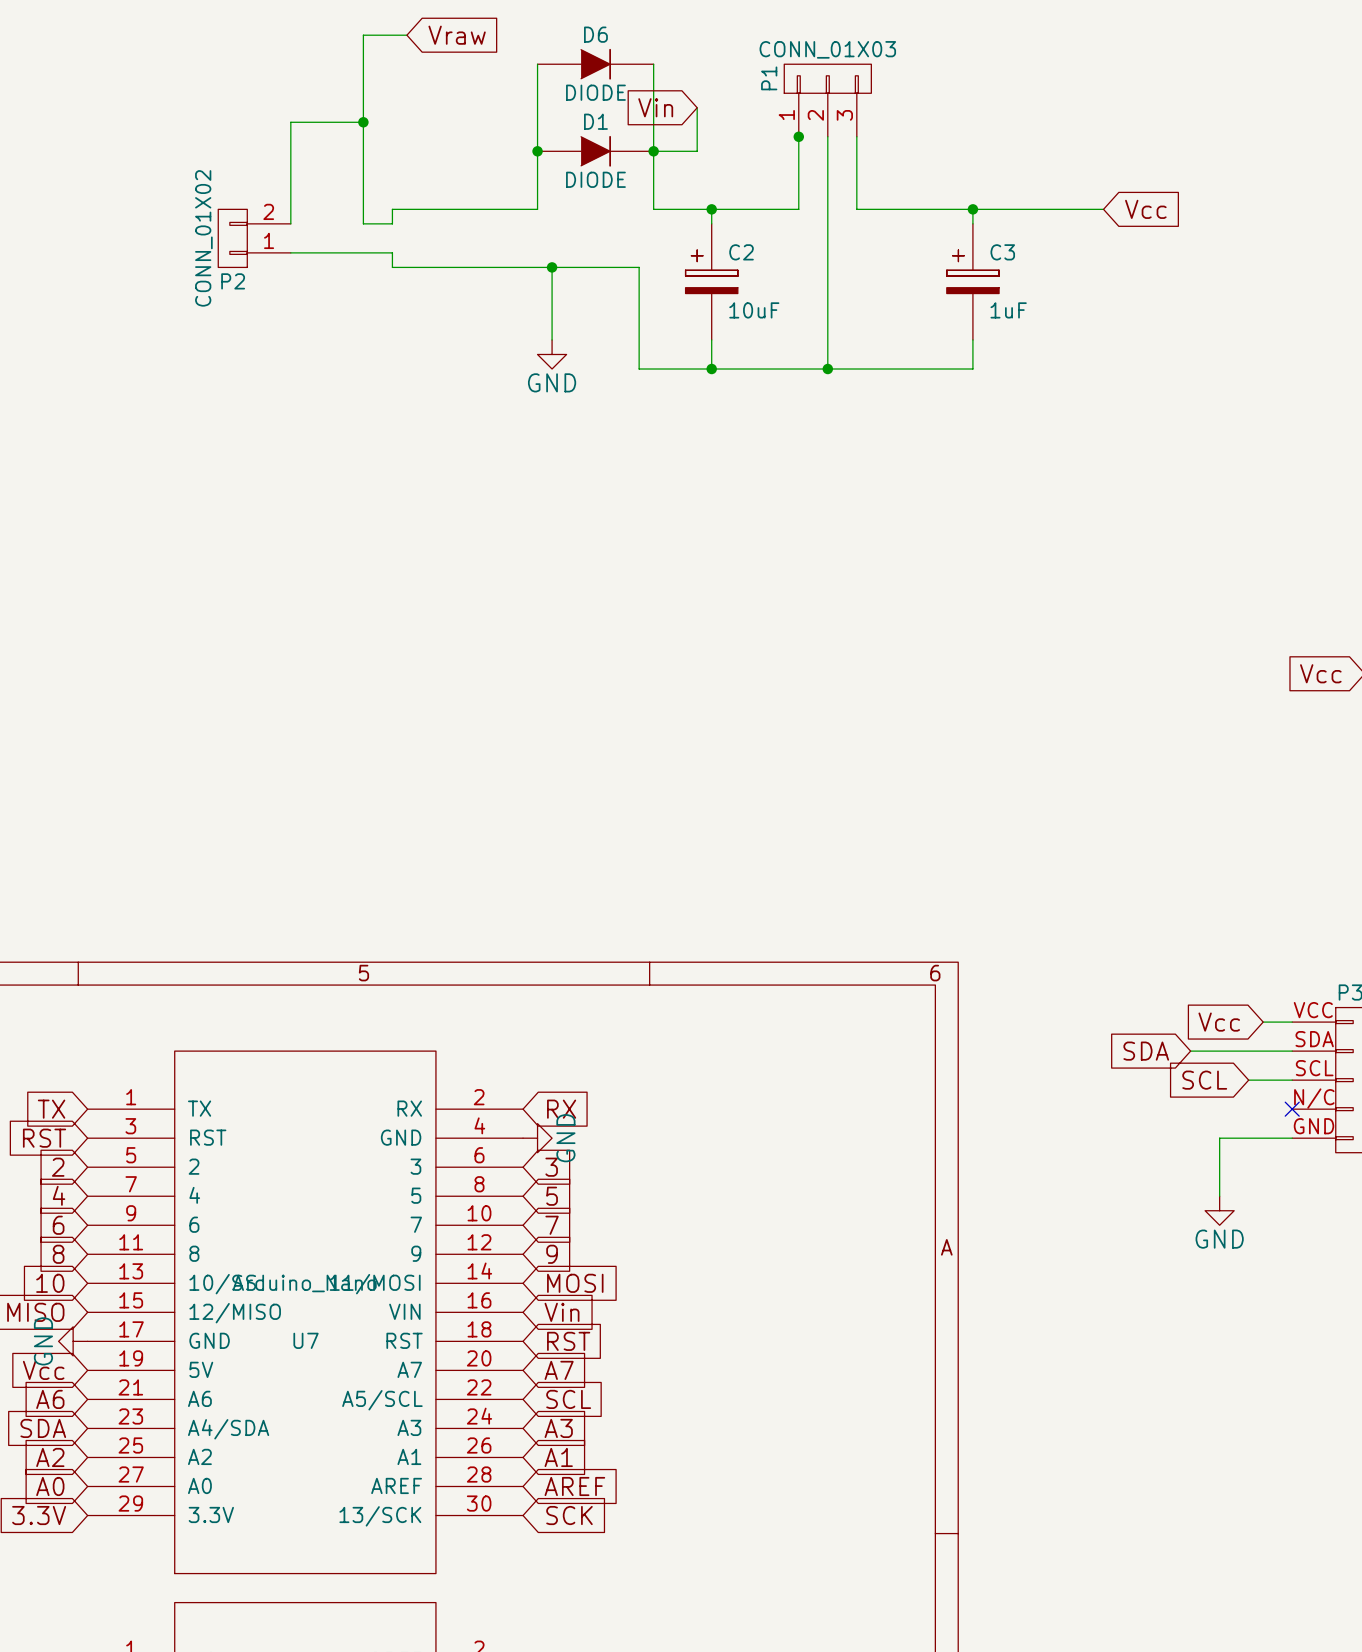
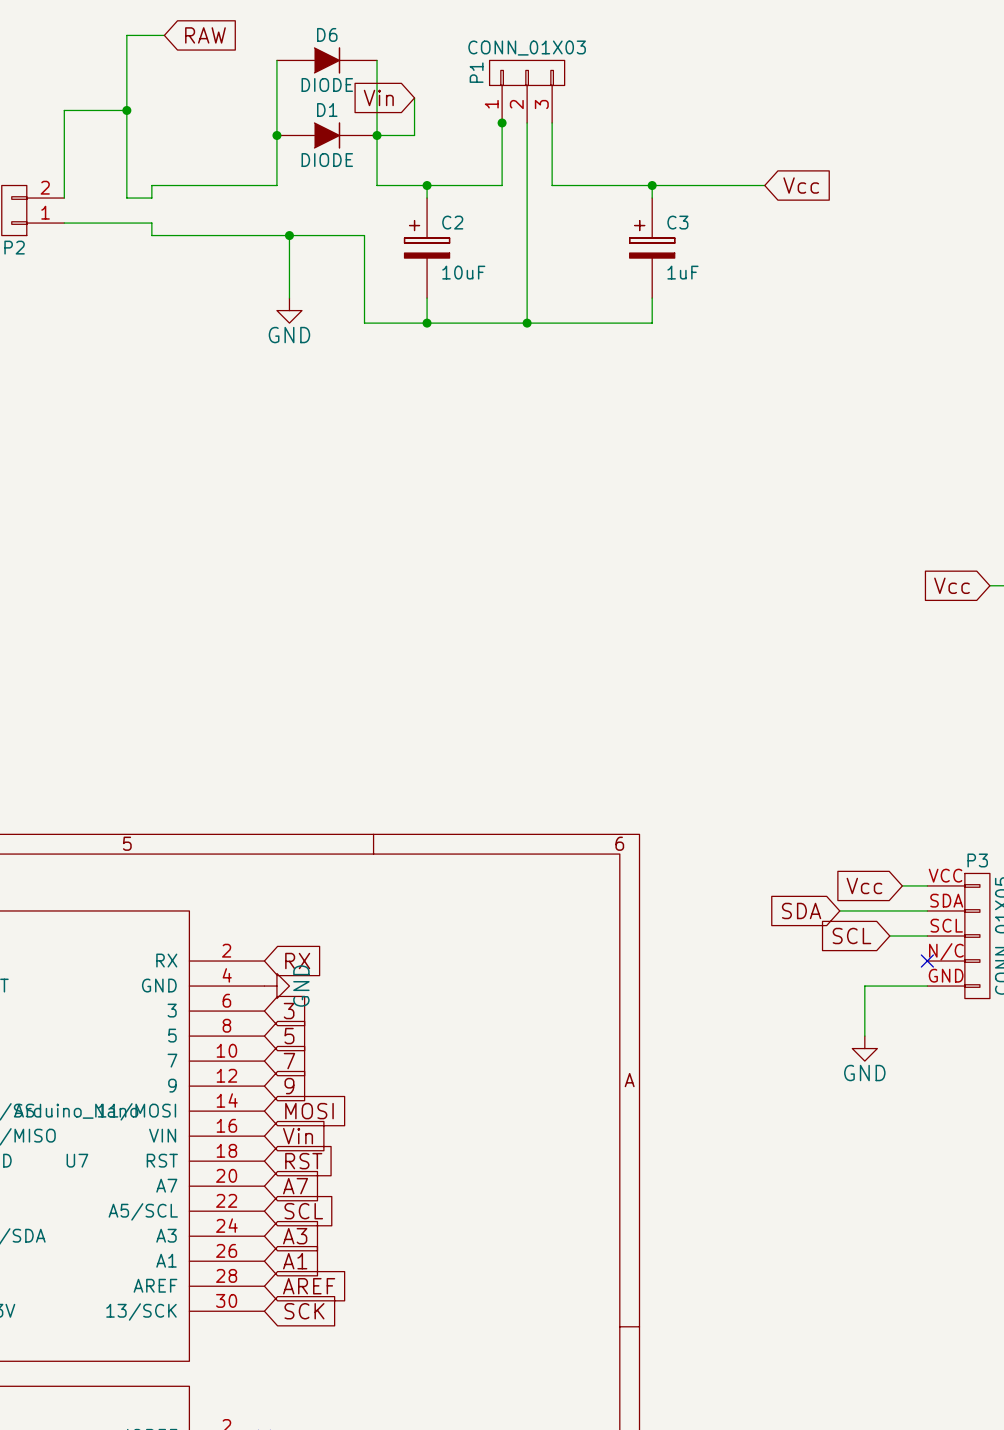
global label: Vraw (457, 35) -> RAW (205, 35)

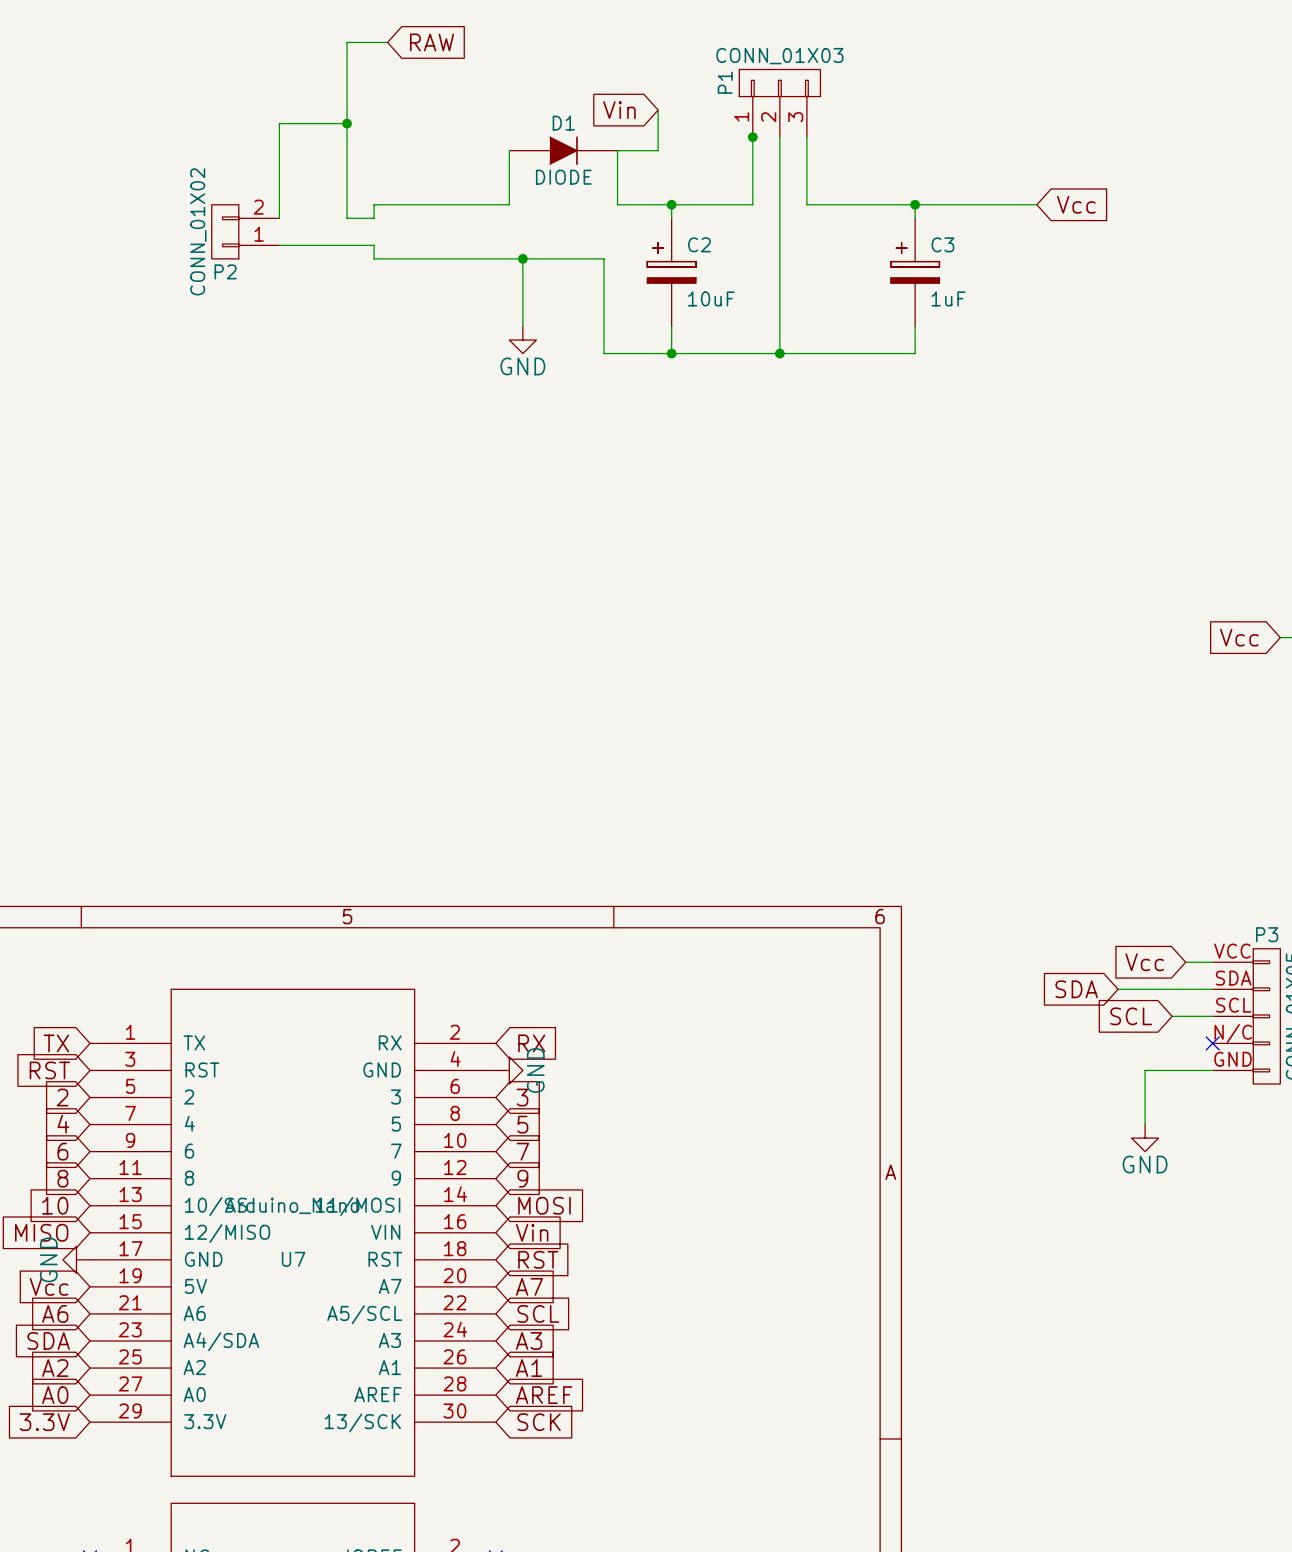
wire: (276, 60) (276, 135) -> none
D6: DIODE (326, 60) -> none
wire: (377, 60) (377, 135) -> none
junction: (276, 135) -> none
junction: (377, 135) -> none

